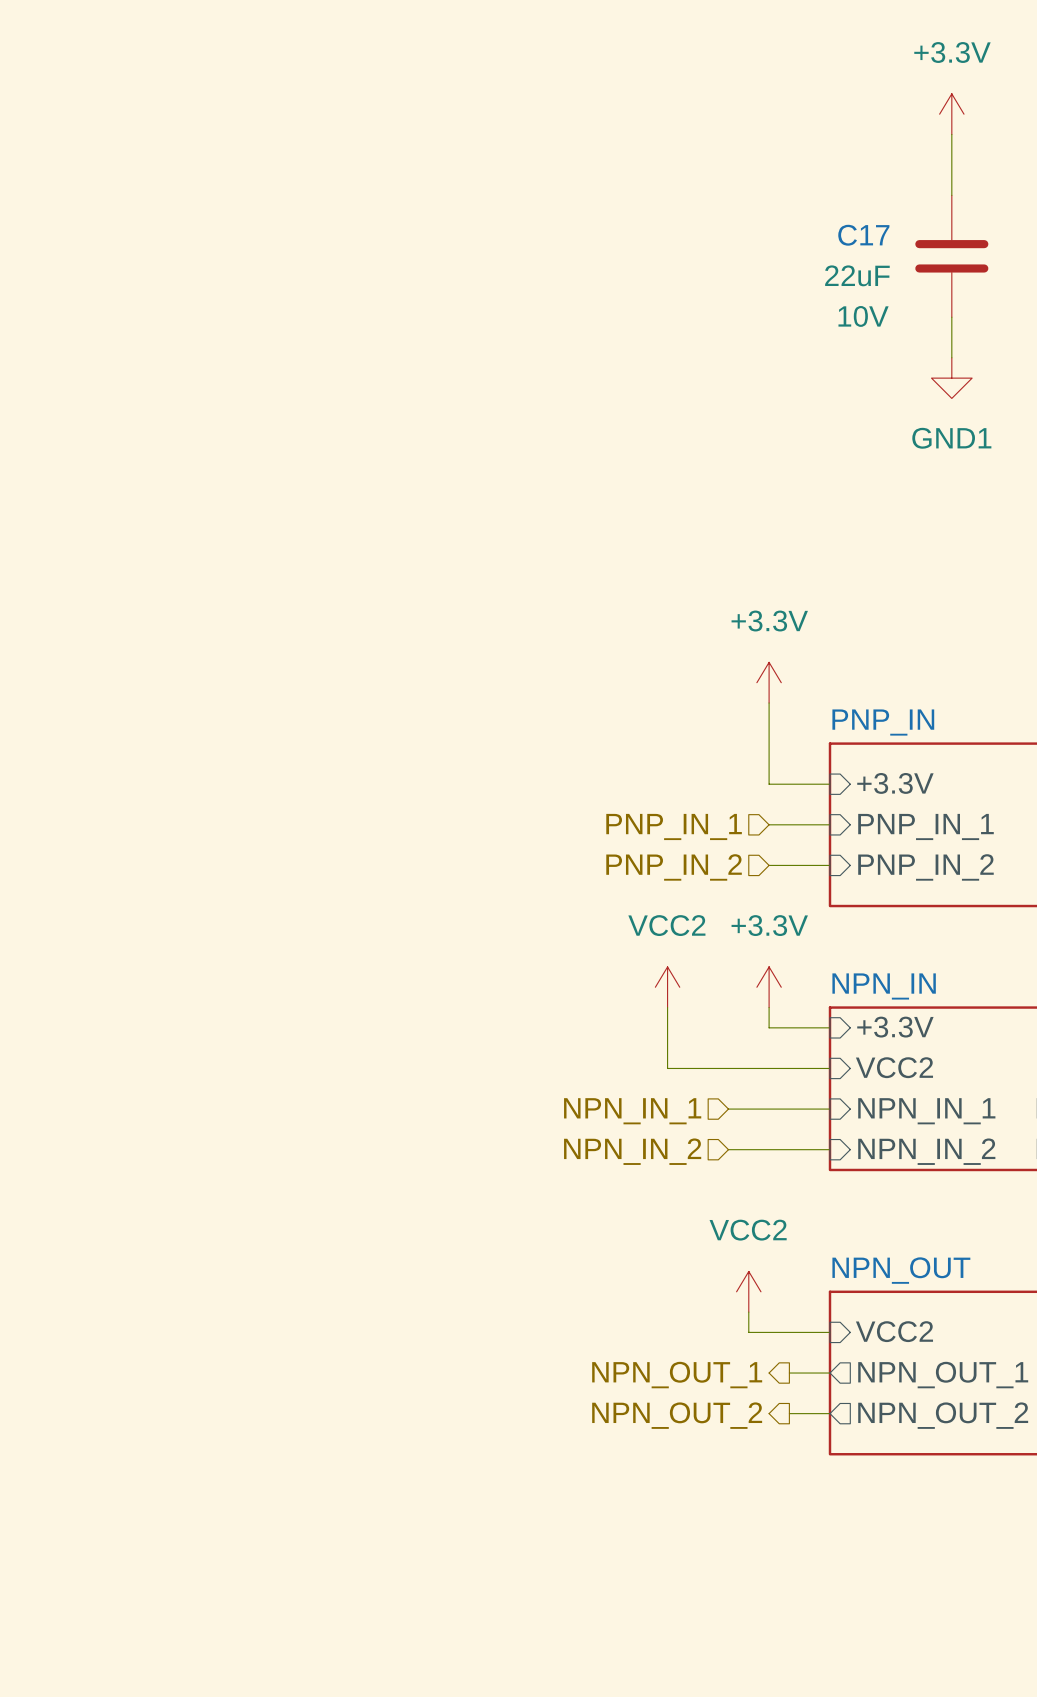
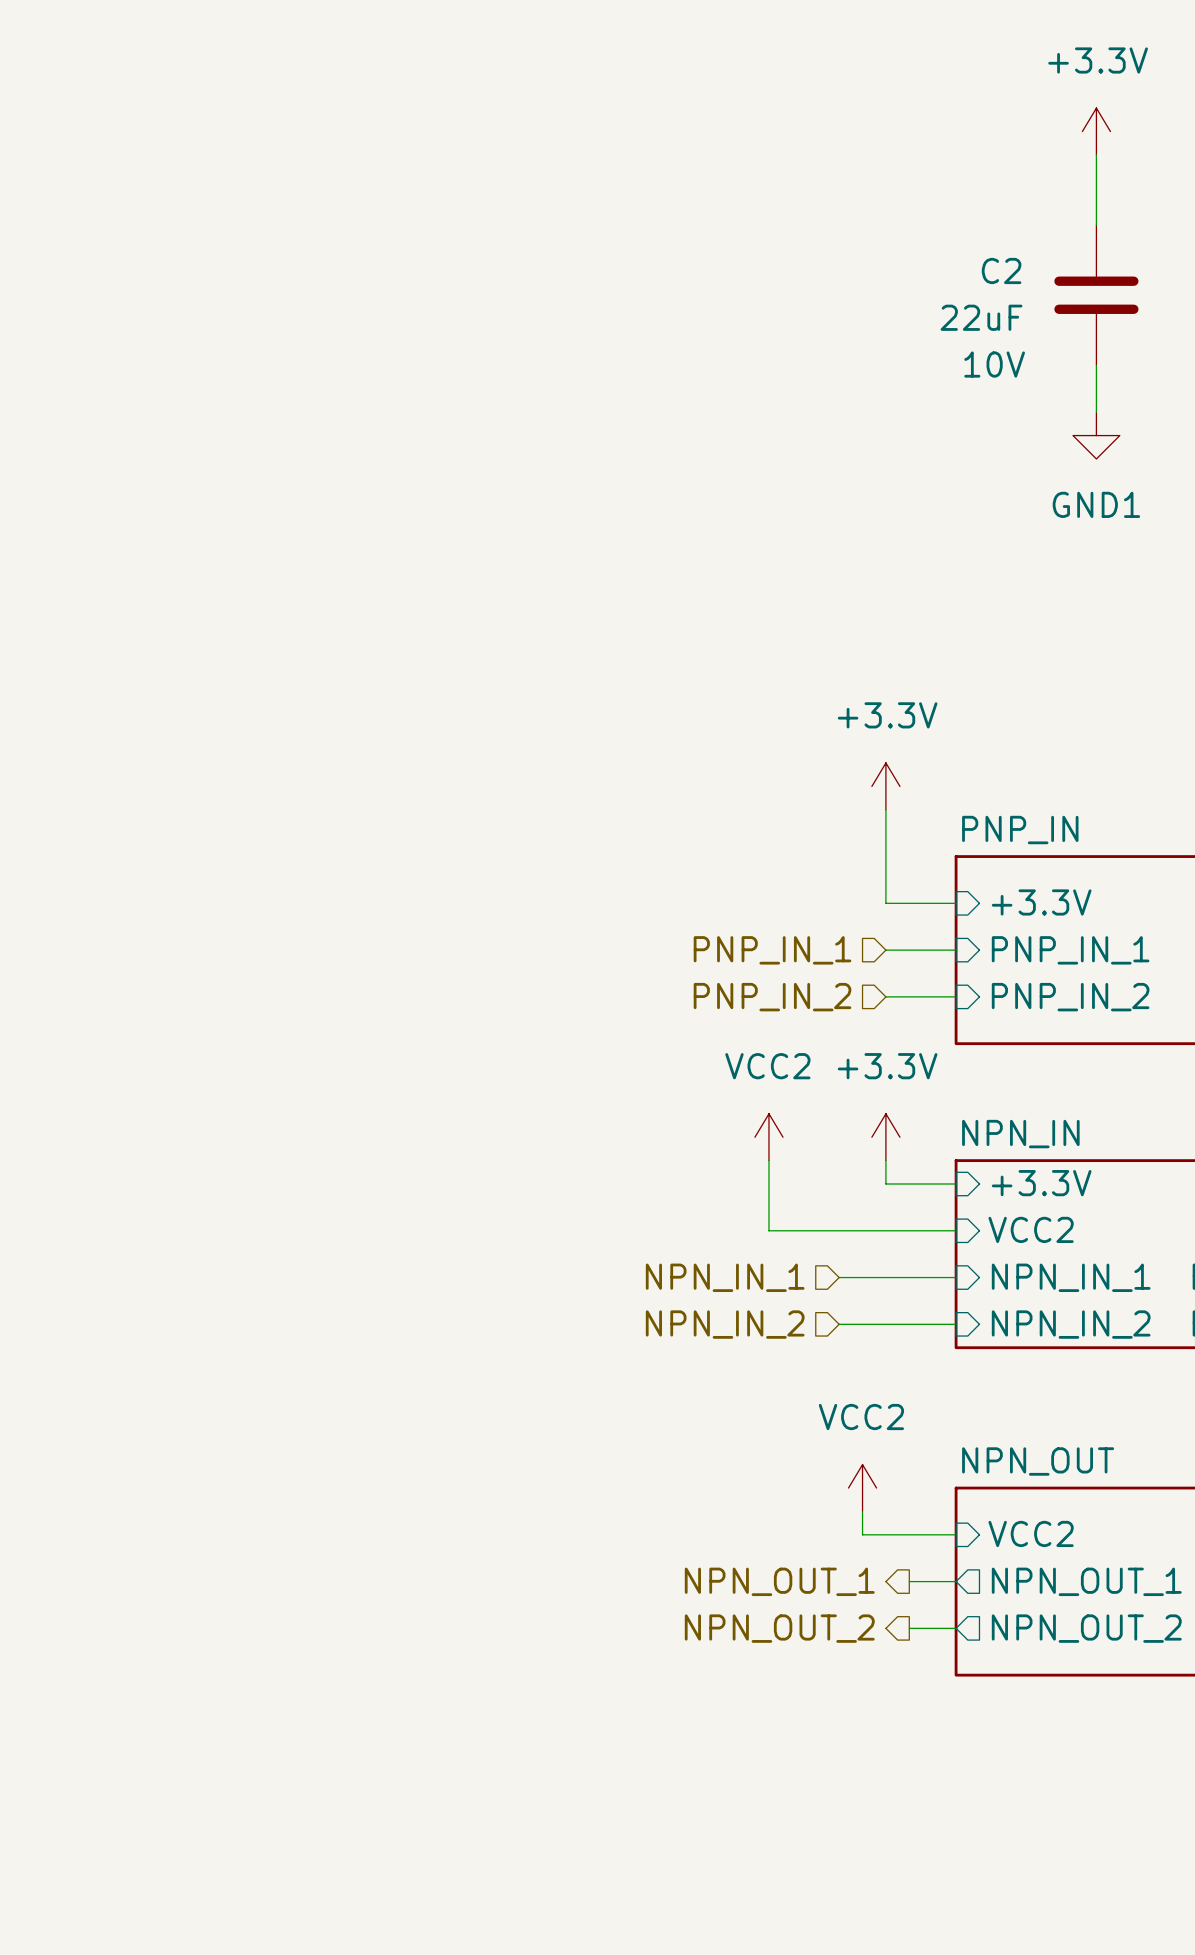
C17 name: C17 (863, 235) -> C2 (1001, 270)

